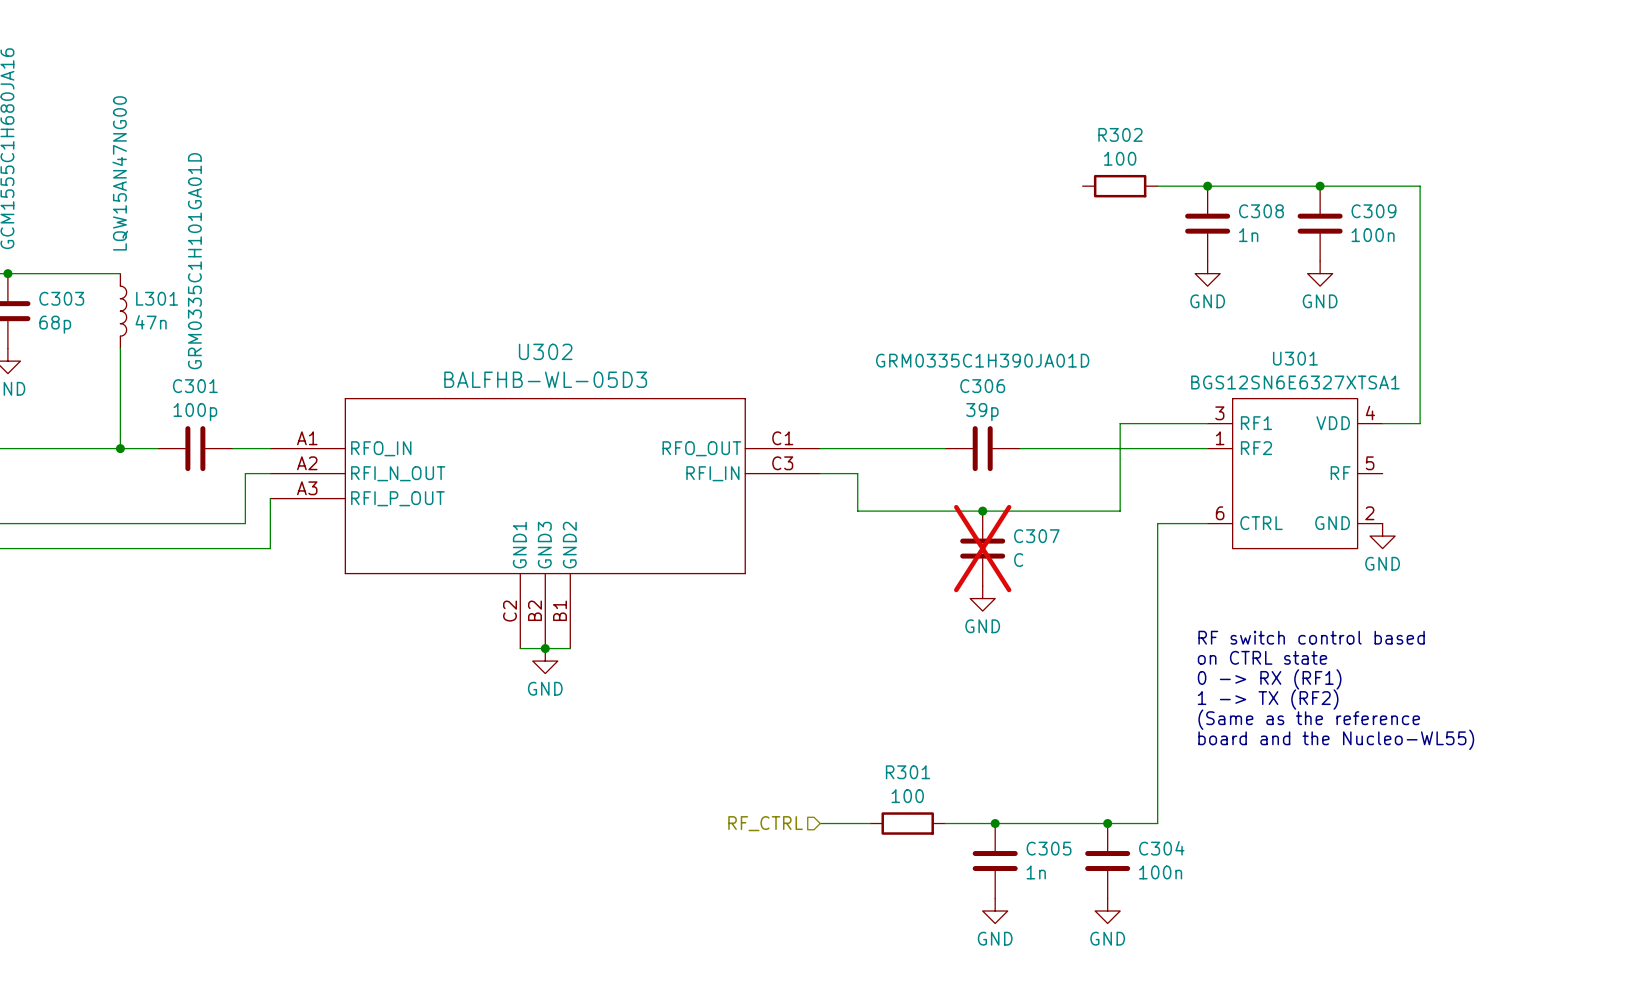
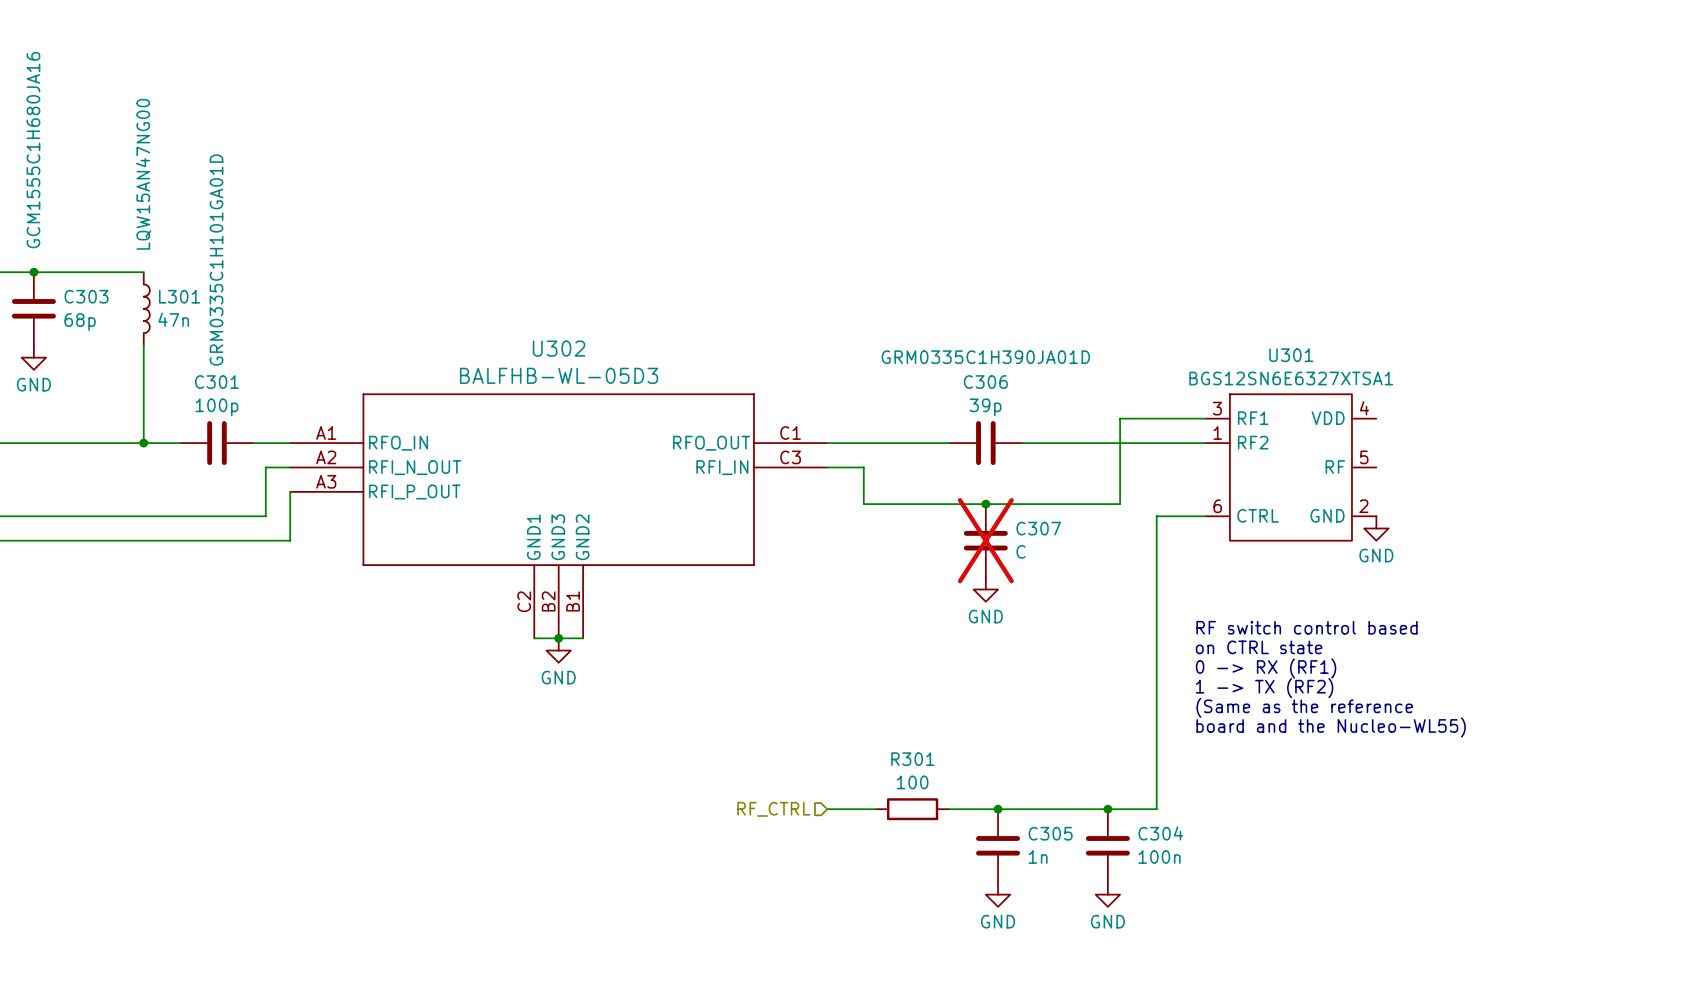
R302: 100 (1120, 186) -> none
wire: (1157, 186) (1420, 186) (1420, 423) (1382, 423) -> none
junction: (1207, 186) -> none
junction: (1320, 186) -> none
C308: 1n (1207, 223) -> none
C309: 100n (1320, 223) -> none
power symbol: GND (1207, 273) -> none
power symbol: GND (1320, 273) -> none

